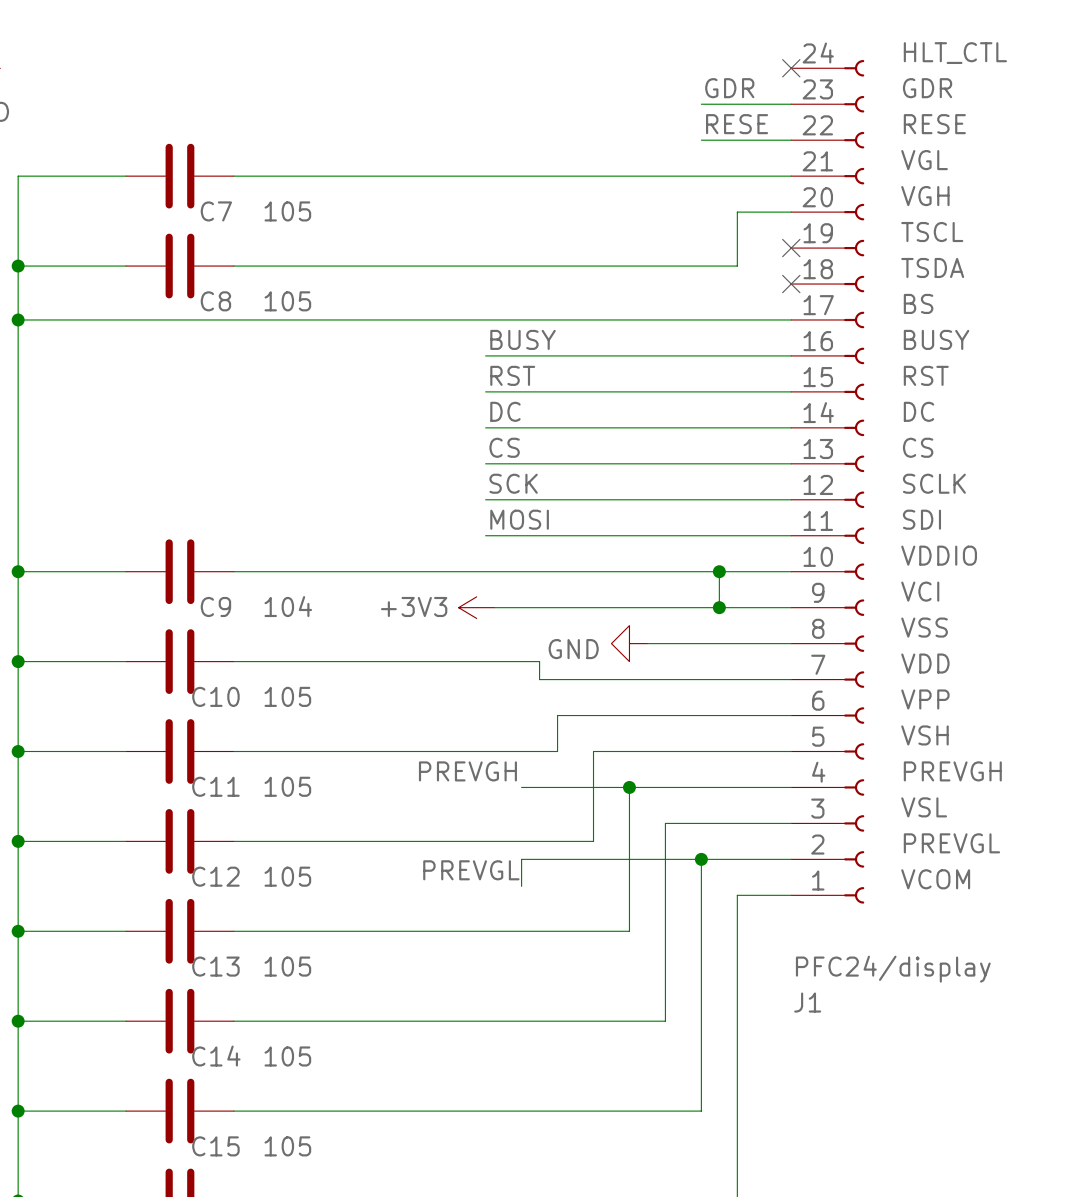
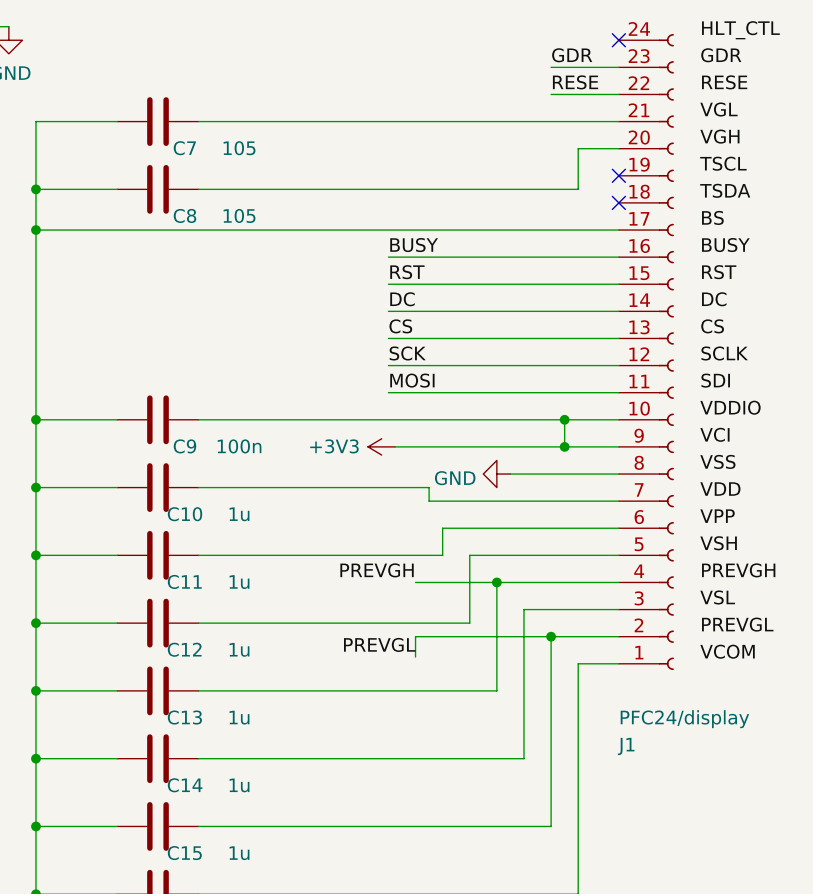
C9 value: 104 (288, 606) -> 100n (239, 446)
C10 value: 105 (287, 696) -> 1u (239, 514)
C11 value: 105 (287, 786) -> 1u (239, 582)
C12 value: 105 (287, 876) -> 1u (239, 649)
C13 value: 105 (287, 966) -> 1u (239, 717)
C14 value: 105 (287, 1056) -> 1u (239, 785)
C15 value: 105 (287, 1146) -> 1u (239, 853)

